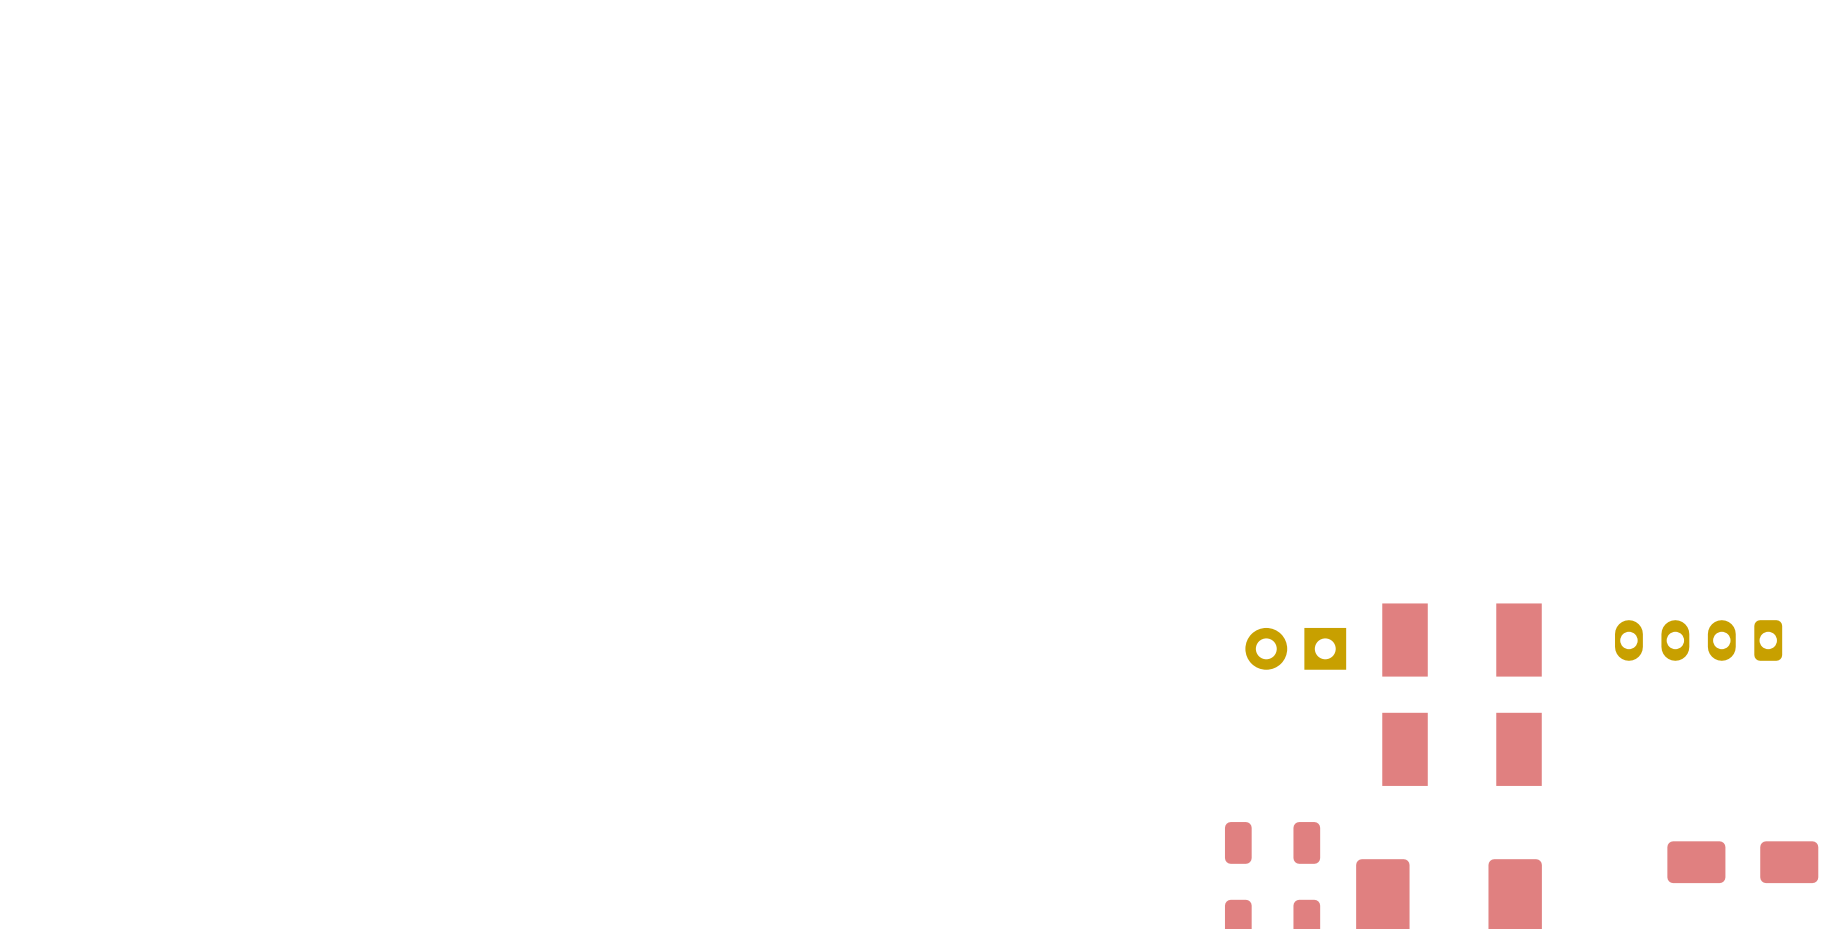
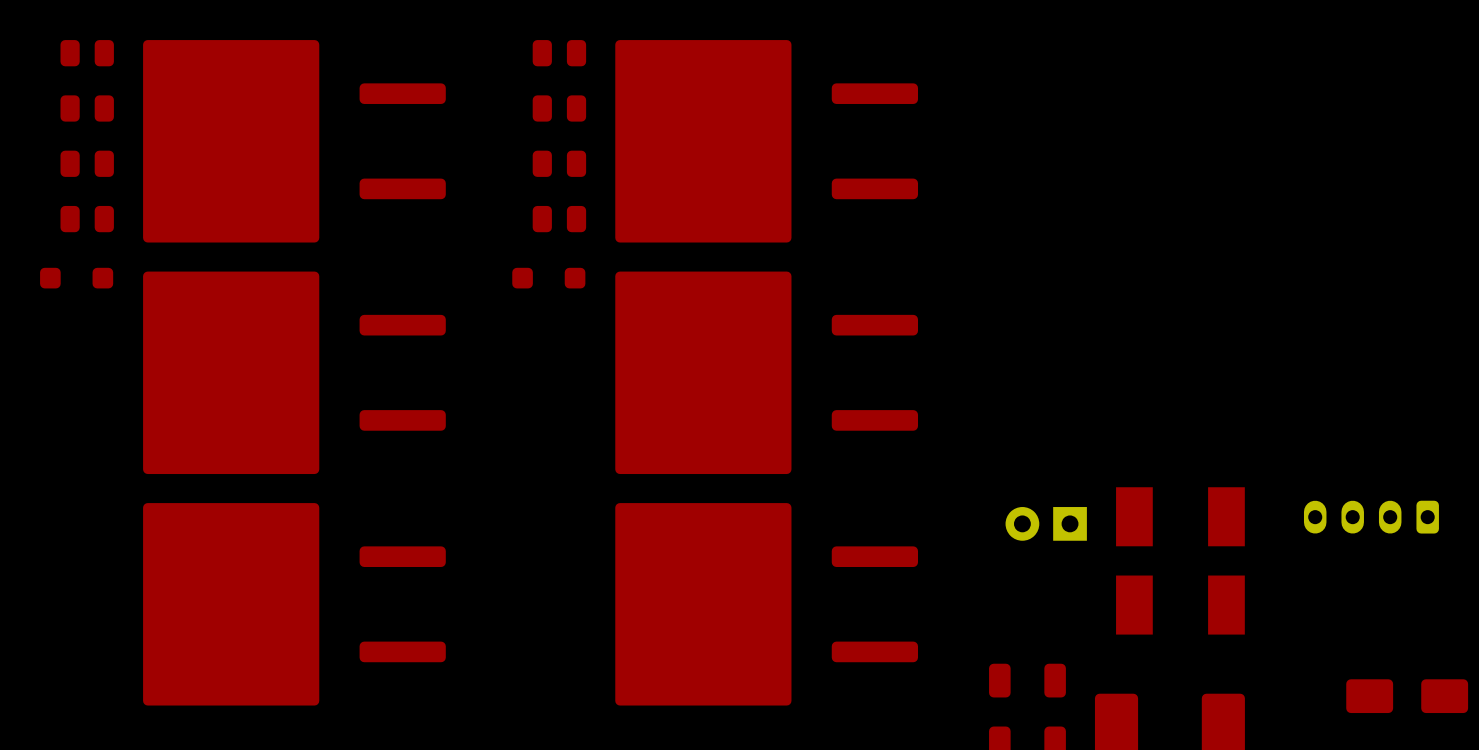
part: none -> (87, 53)
part: none -> (559, 53)
part: none -> (87, 108)
part: none -> (559, 108)
part: none -> (294, 141)
part: none -> (766, 141)
part: none -> (87, 163)
part: none -> (559, 163)
part: none -> (87, 219)
part: none -> (559, 219)
part: none -> (76, 278)
part: none -> (548, 278)
part: none -> (294, 372)
part: none -> (766, 372)
part: none -> (294, 604)
part: none -> (766, 604)

